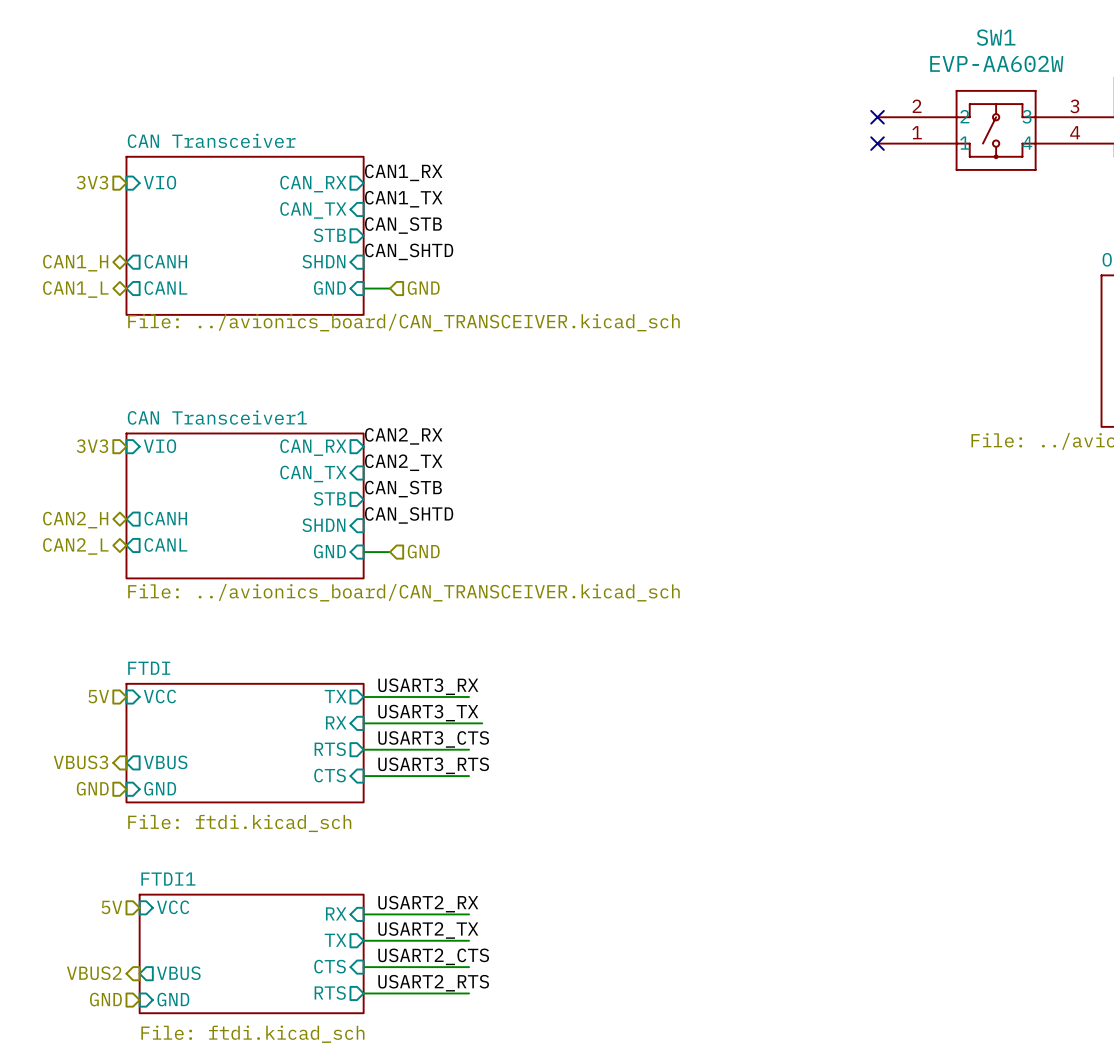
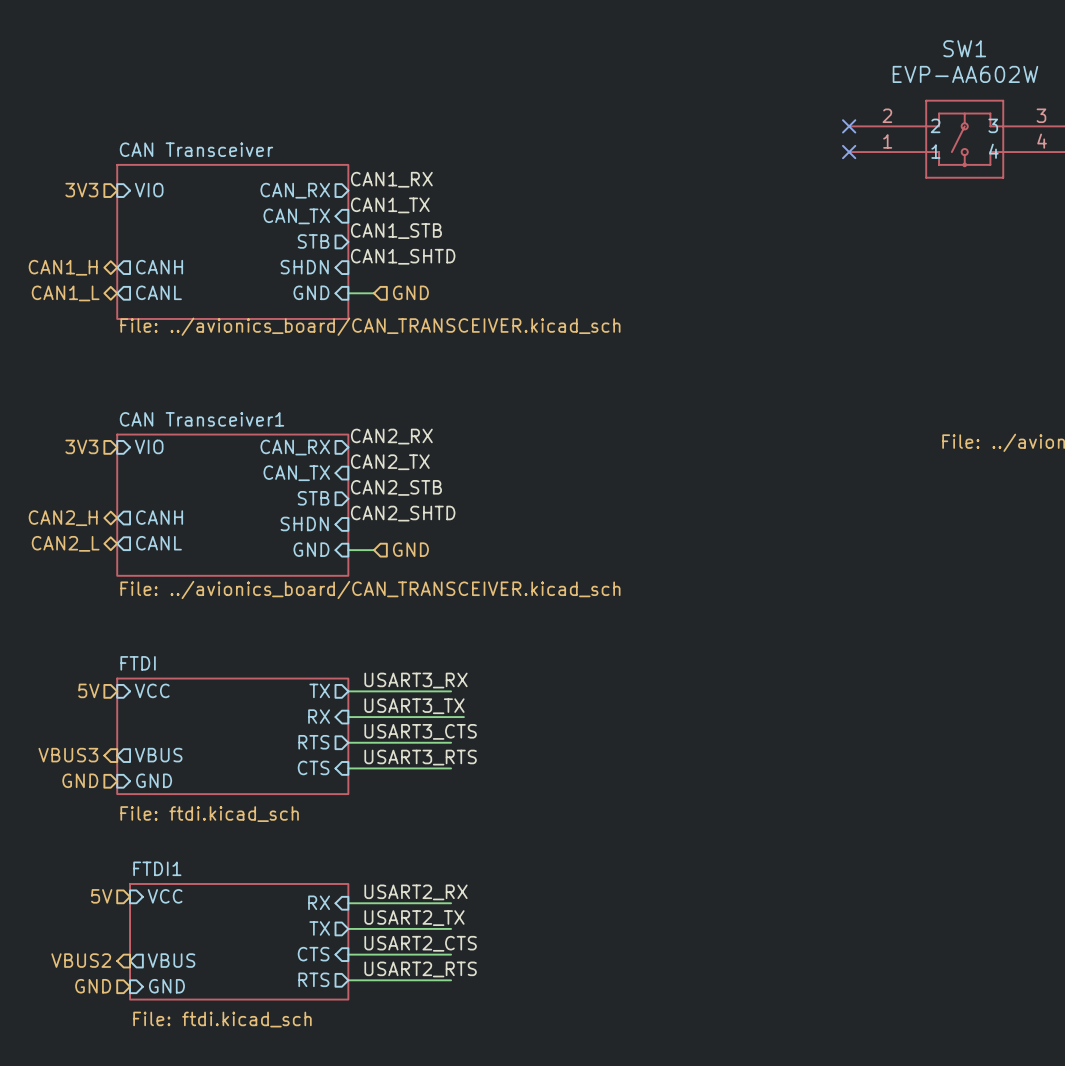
label: CAN_STB (403, 225) -> CAN1_STB (396, 231)
label: CAN_SHTD (409, 251) -> CAN1_SHTD (403, 256)
label: CAN_STB (403, 489) -> CAN2_STB (396, 487)
label: CAN_SHTD (409, 515) -> CAN2_SHTD (403, 513)

